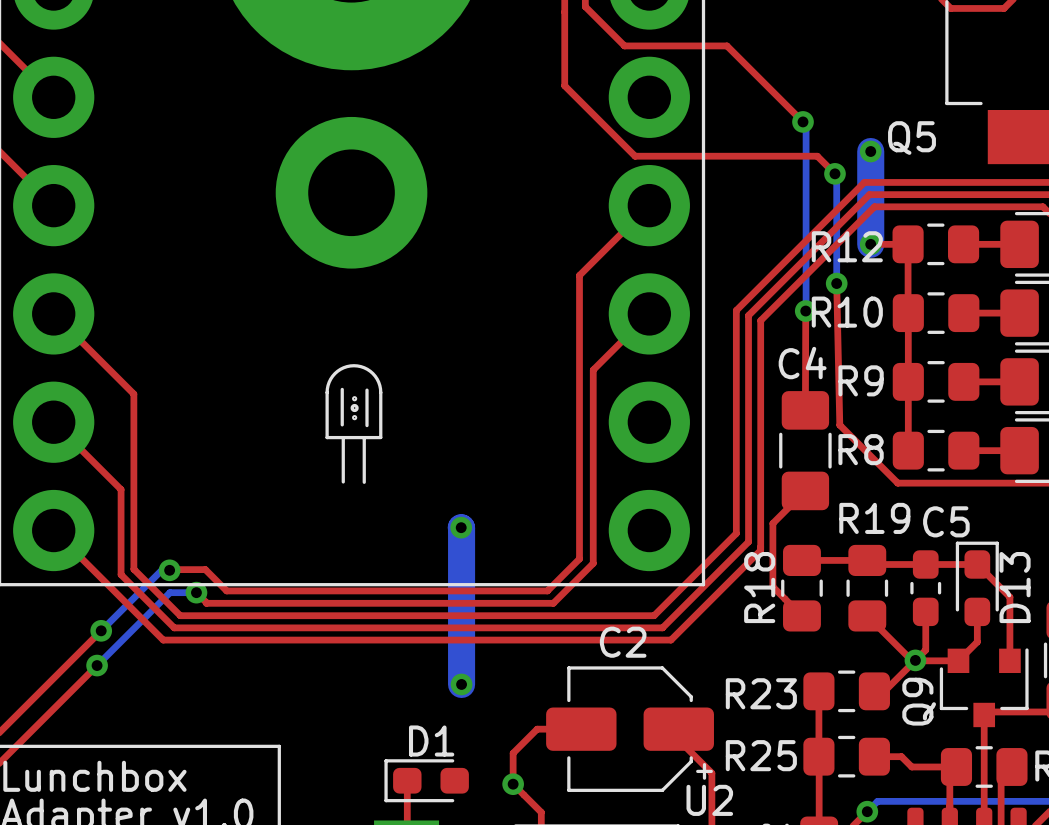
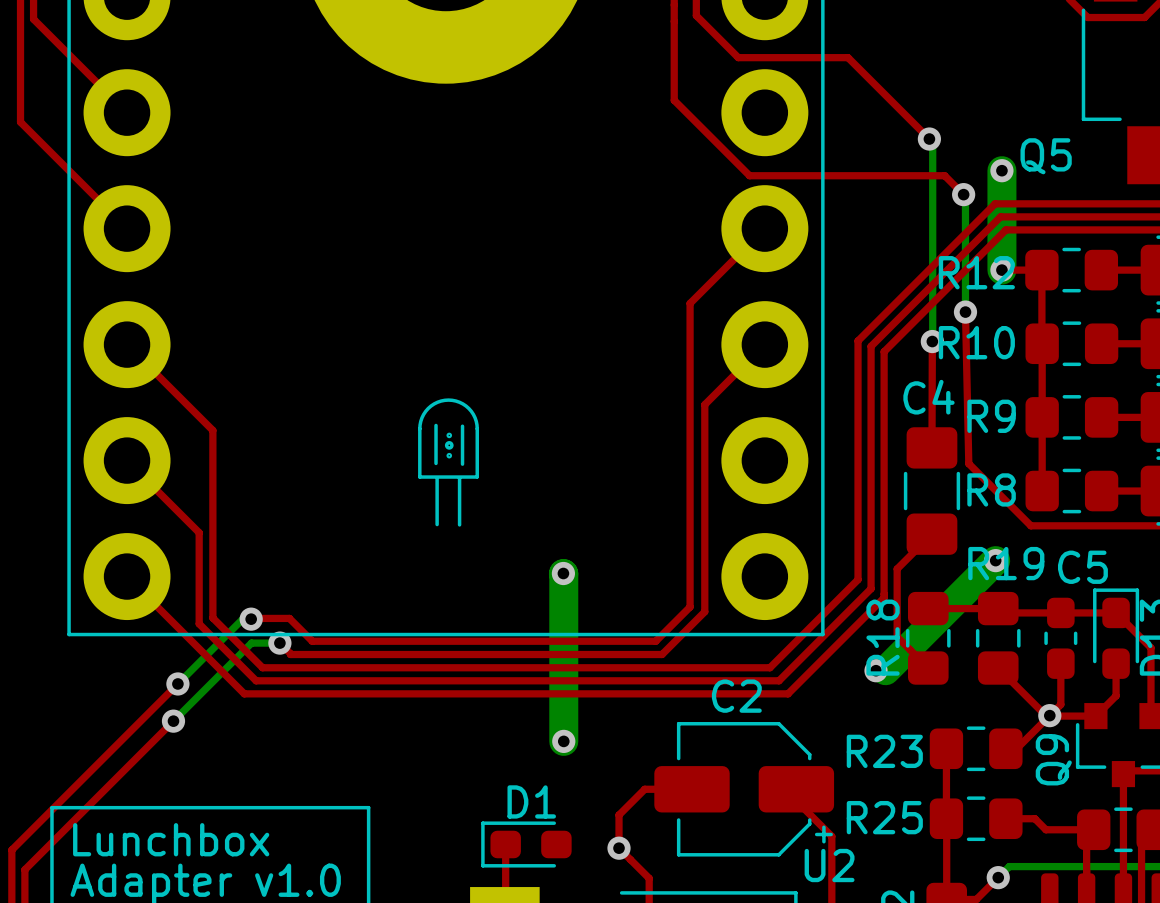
part: (351, 192) -> none
bottom track: none -> (995, 560) (885, 670) (876, 670)
via: none -> (995, 560)
via: none -> (876, 670)

